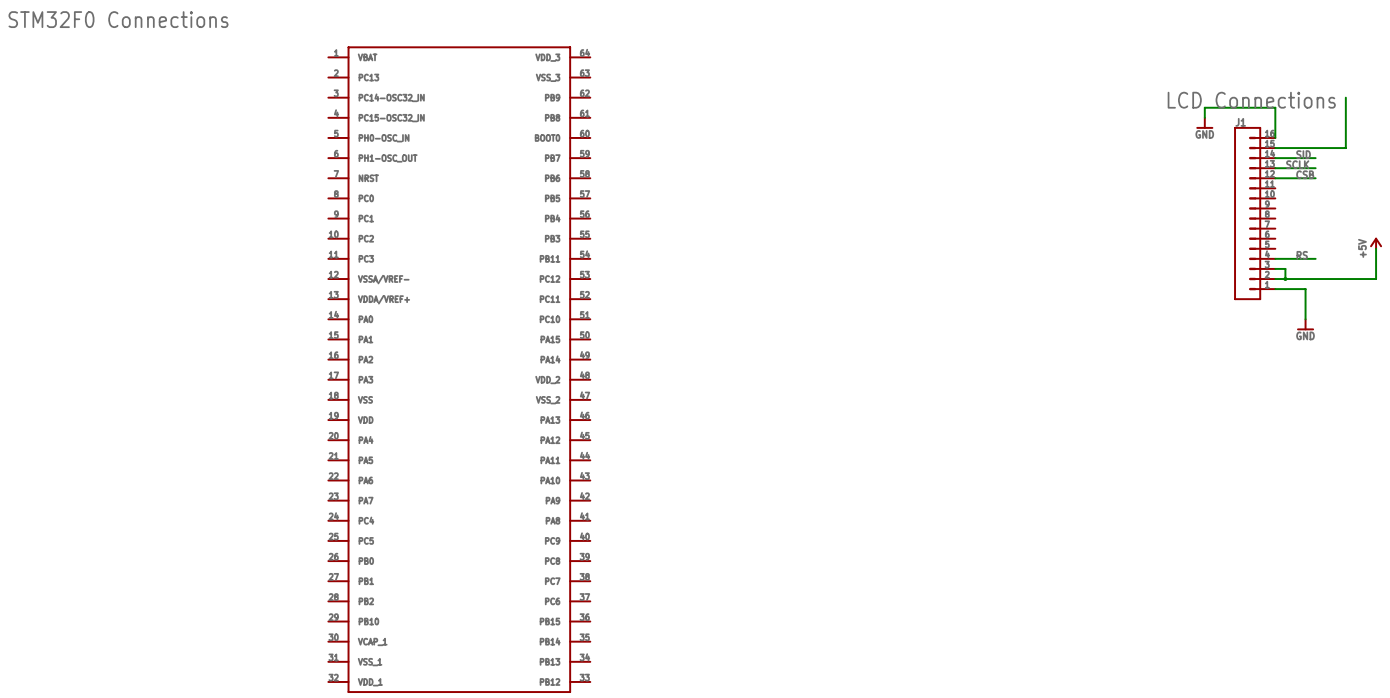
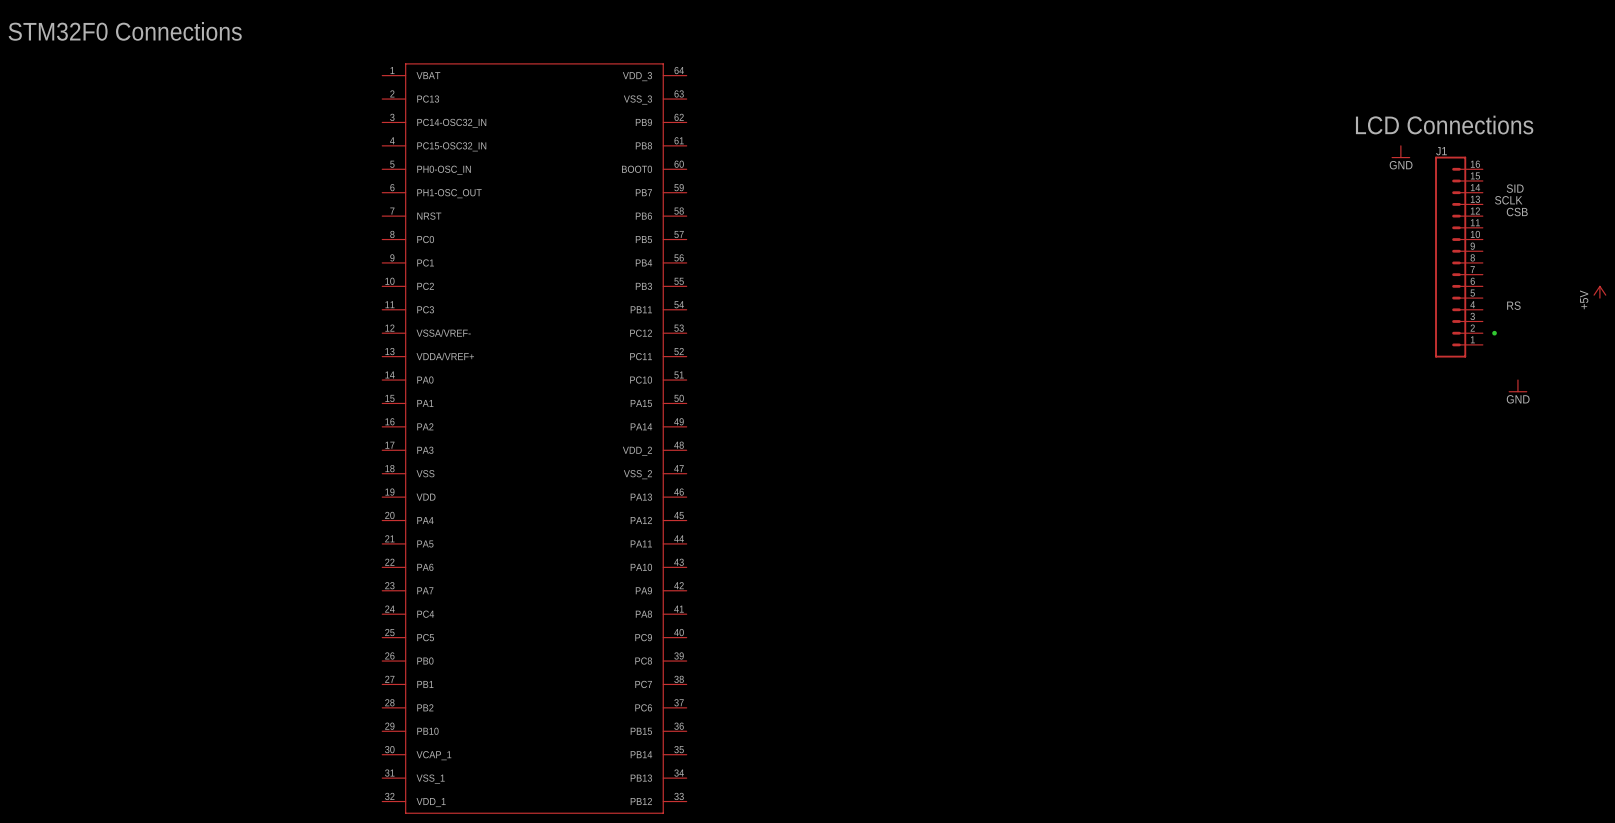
wire: (1345, 97) (1345, 148) (1275, 148) -> none
wire: (1204, 117) (1204, 107) (1275, 107) (1275, 137) -> none
wire: (1275, 158) (1315, 158) -> none
wire: (1275, 168) (1315, 168) -> none
wire: (1275, 178) (1315, 178) -> none
wire: (1376, 248) (1376, 279) (1275, 279) -> none
wire: (1275, 258) (1315, 258) -> none
wire: (1275, 268) (1285, 268) (1285, 279) -> none
wire: (1275, 289) (1305, 289) (1305, 319) -> none

